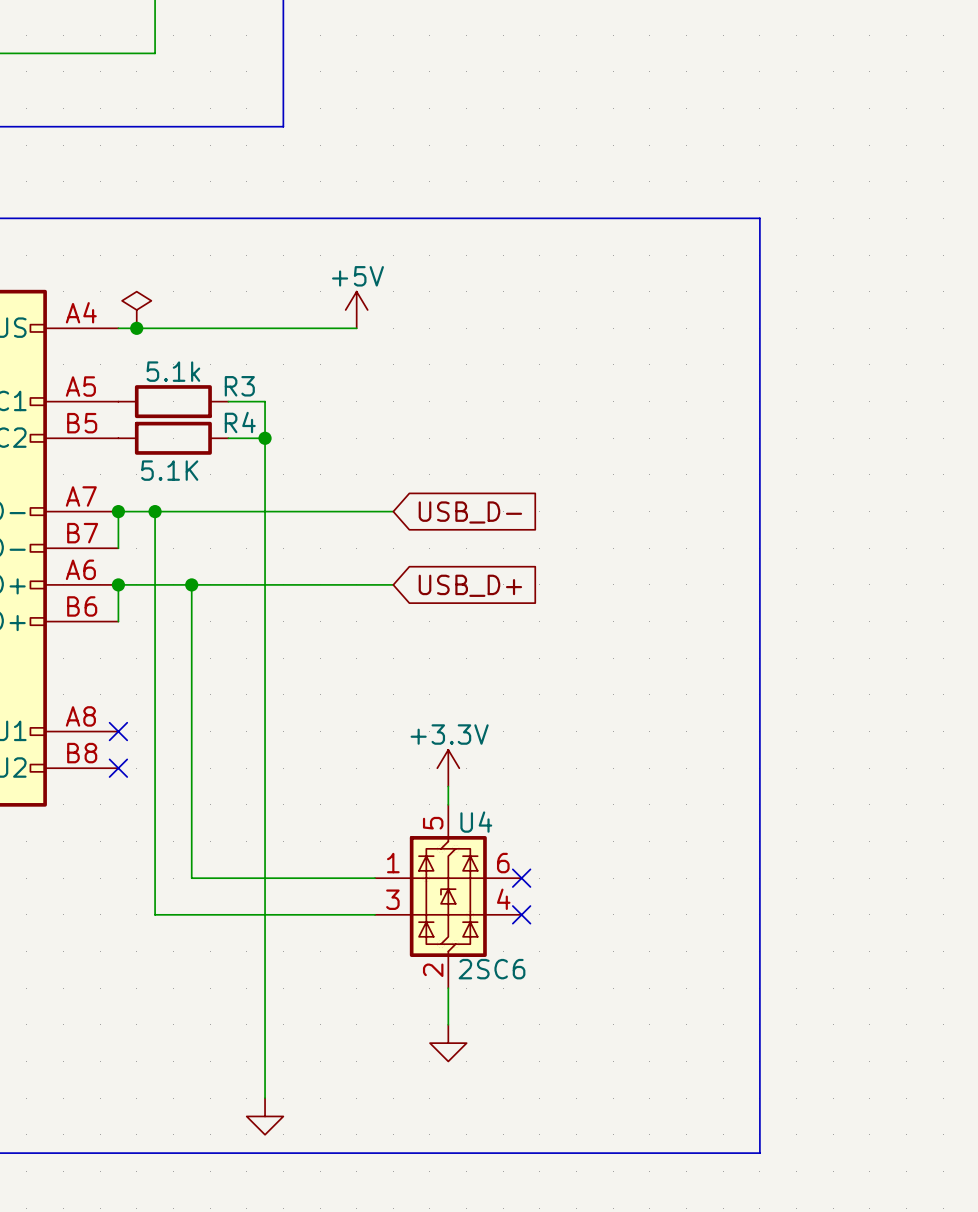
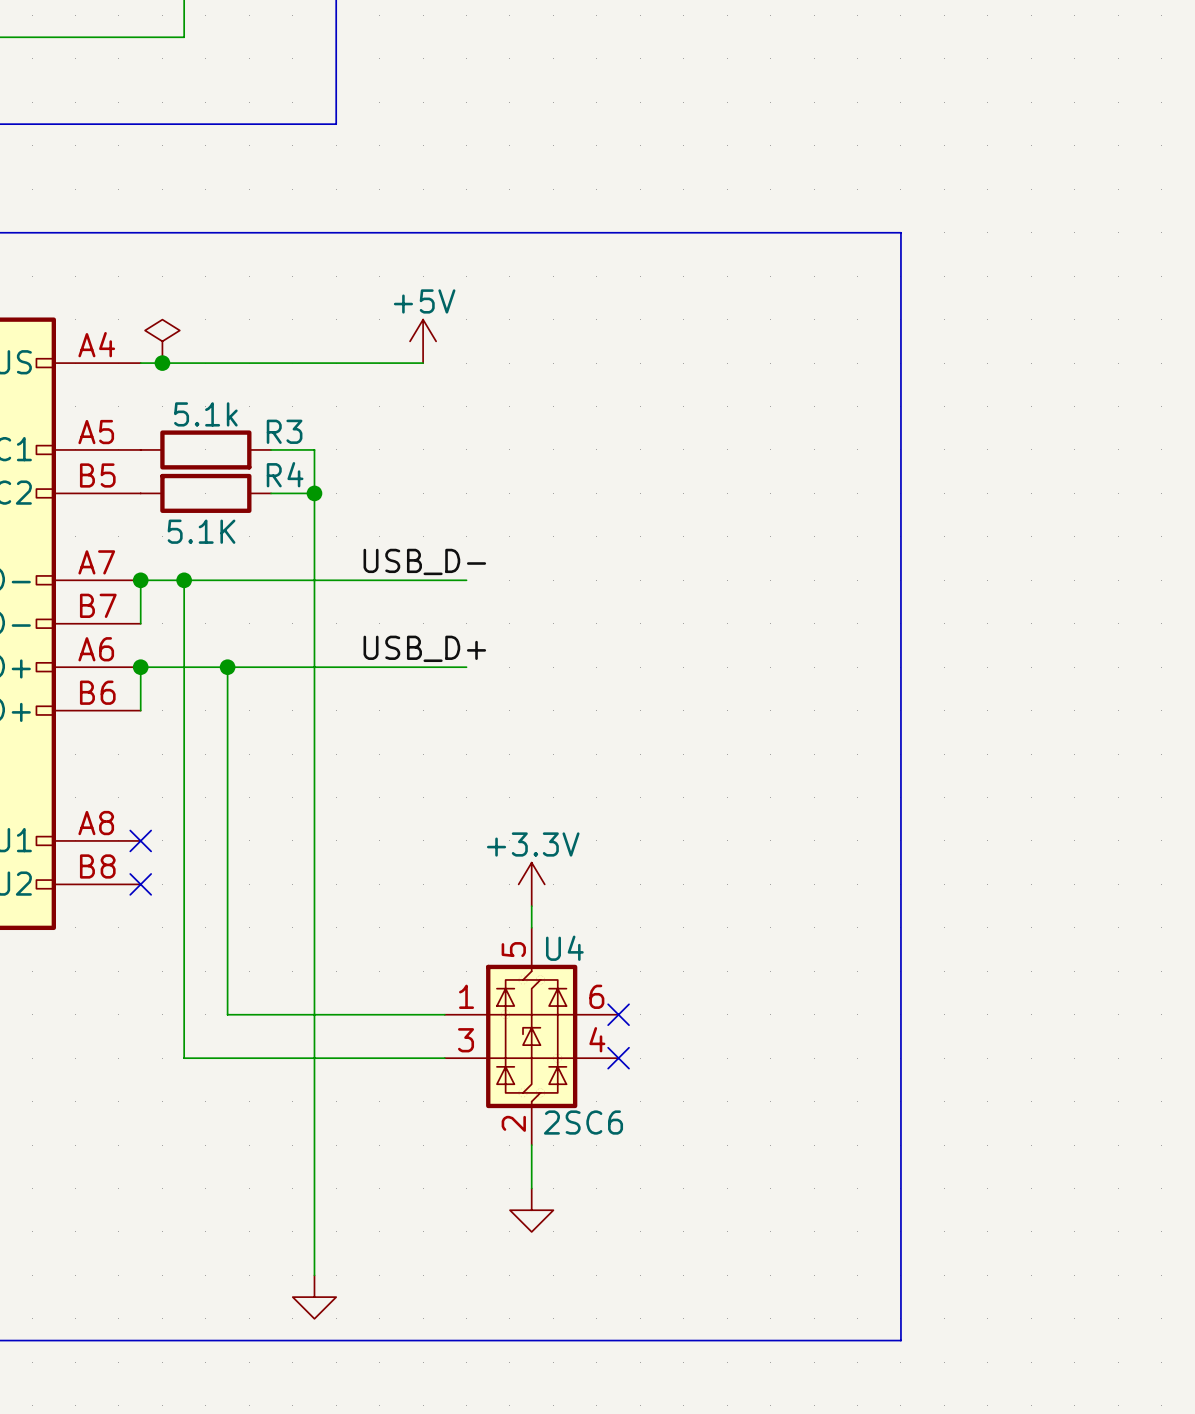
label: none -> USB_D- (424, 561)
global label: USB_D- (470, 512) -> none
label: none -> USB_D+ (424, 648)
global label: USB_D+ (470, 585) -> none

